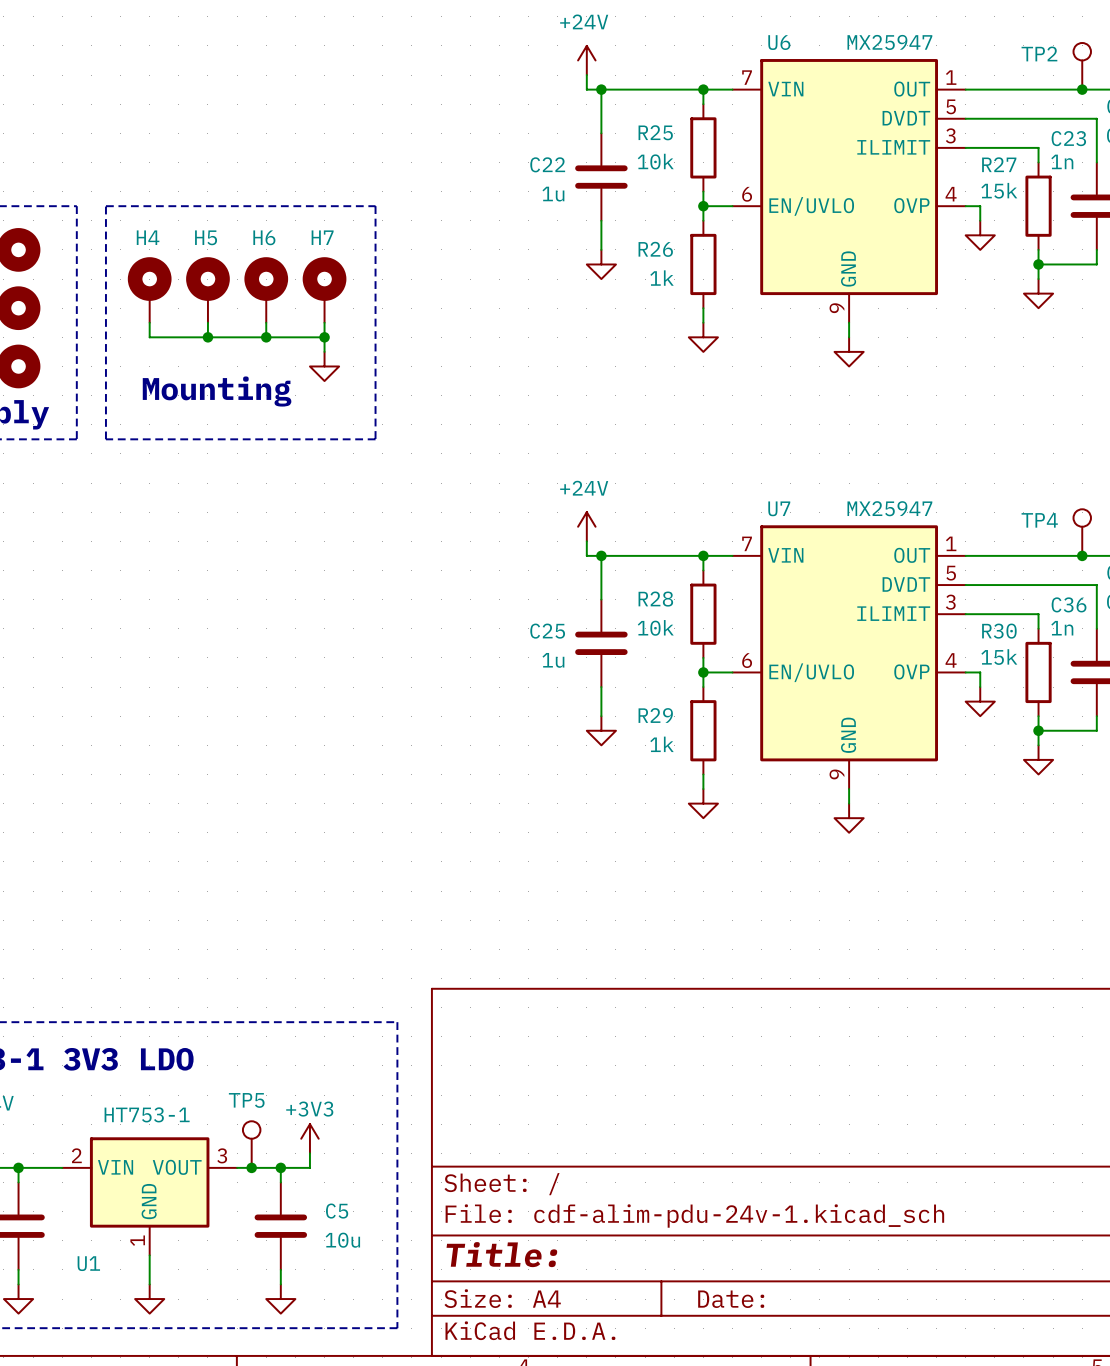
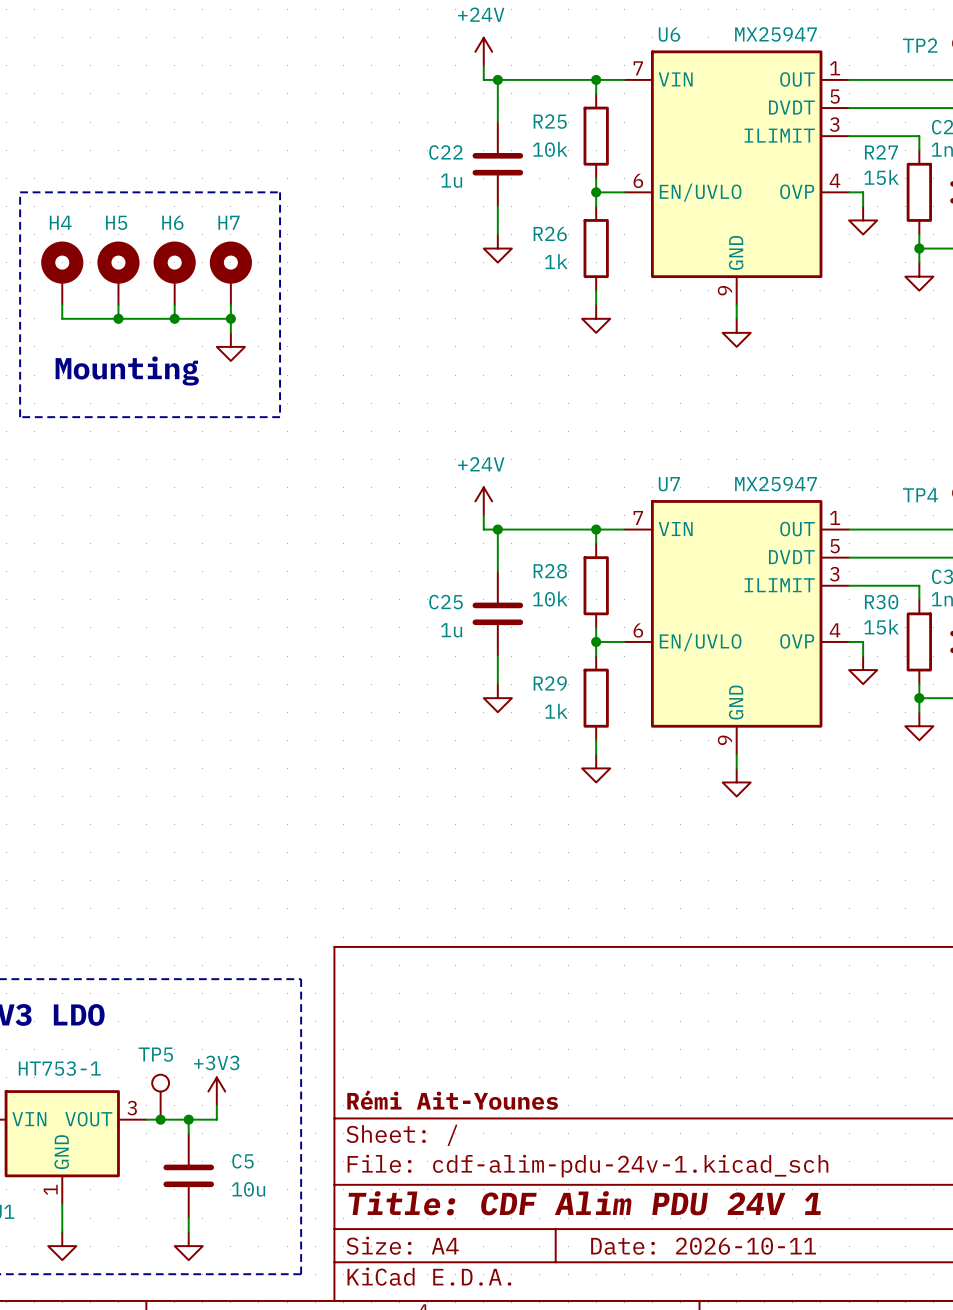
title block: none -> Rémi Ait-Younes (452, 1100)
title block: Title: (501, 1254) -> Title: CDF Alim PDU 24V 1 (584, 1203)
title block: Date: (731, 1299) -> Date: 2026-10-11 (703, 1246)

